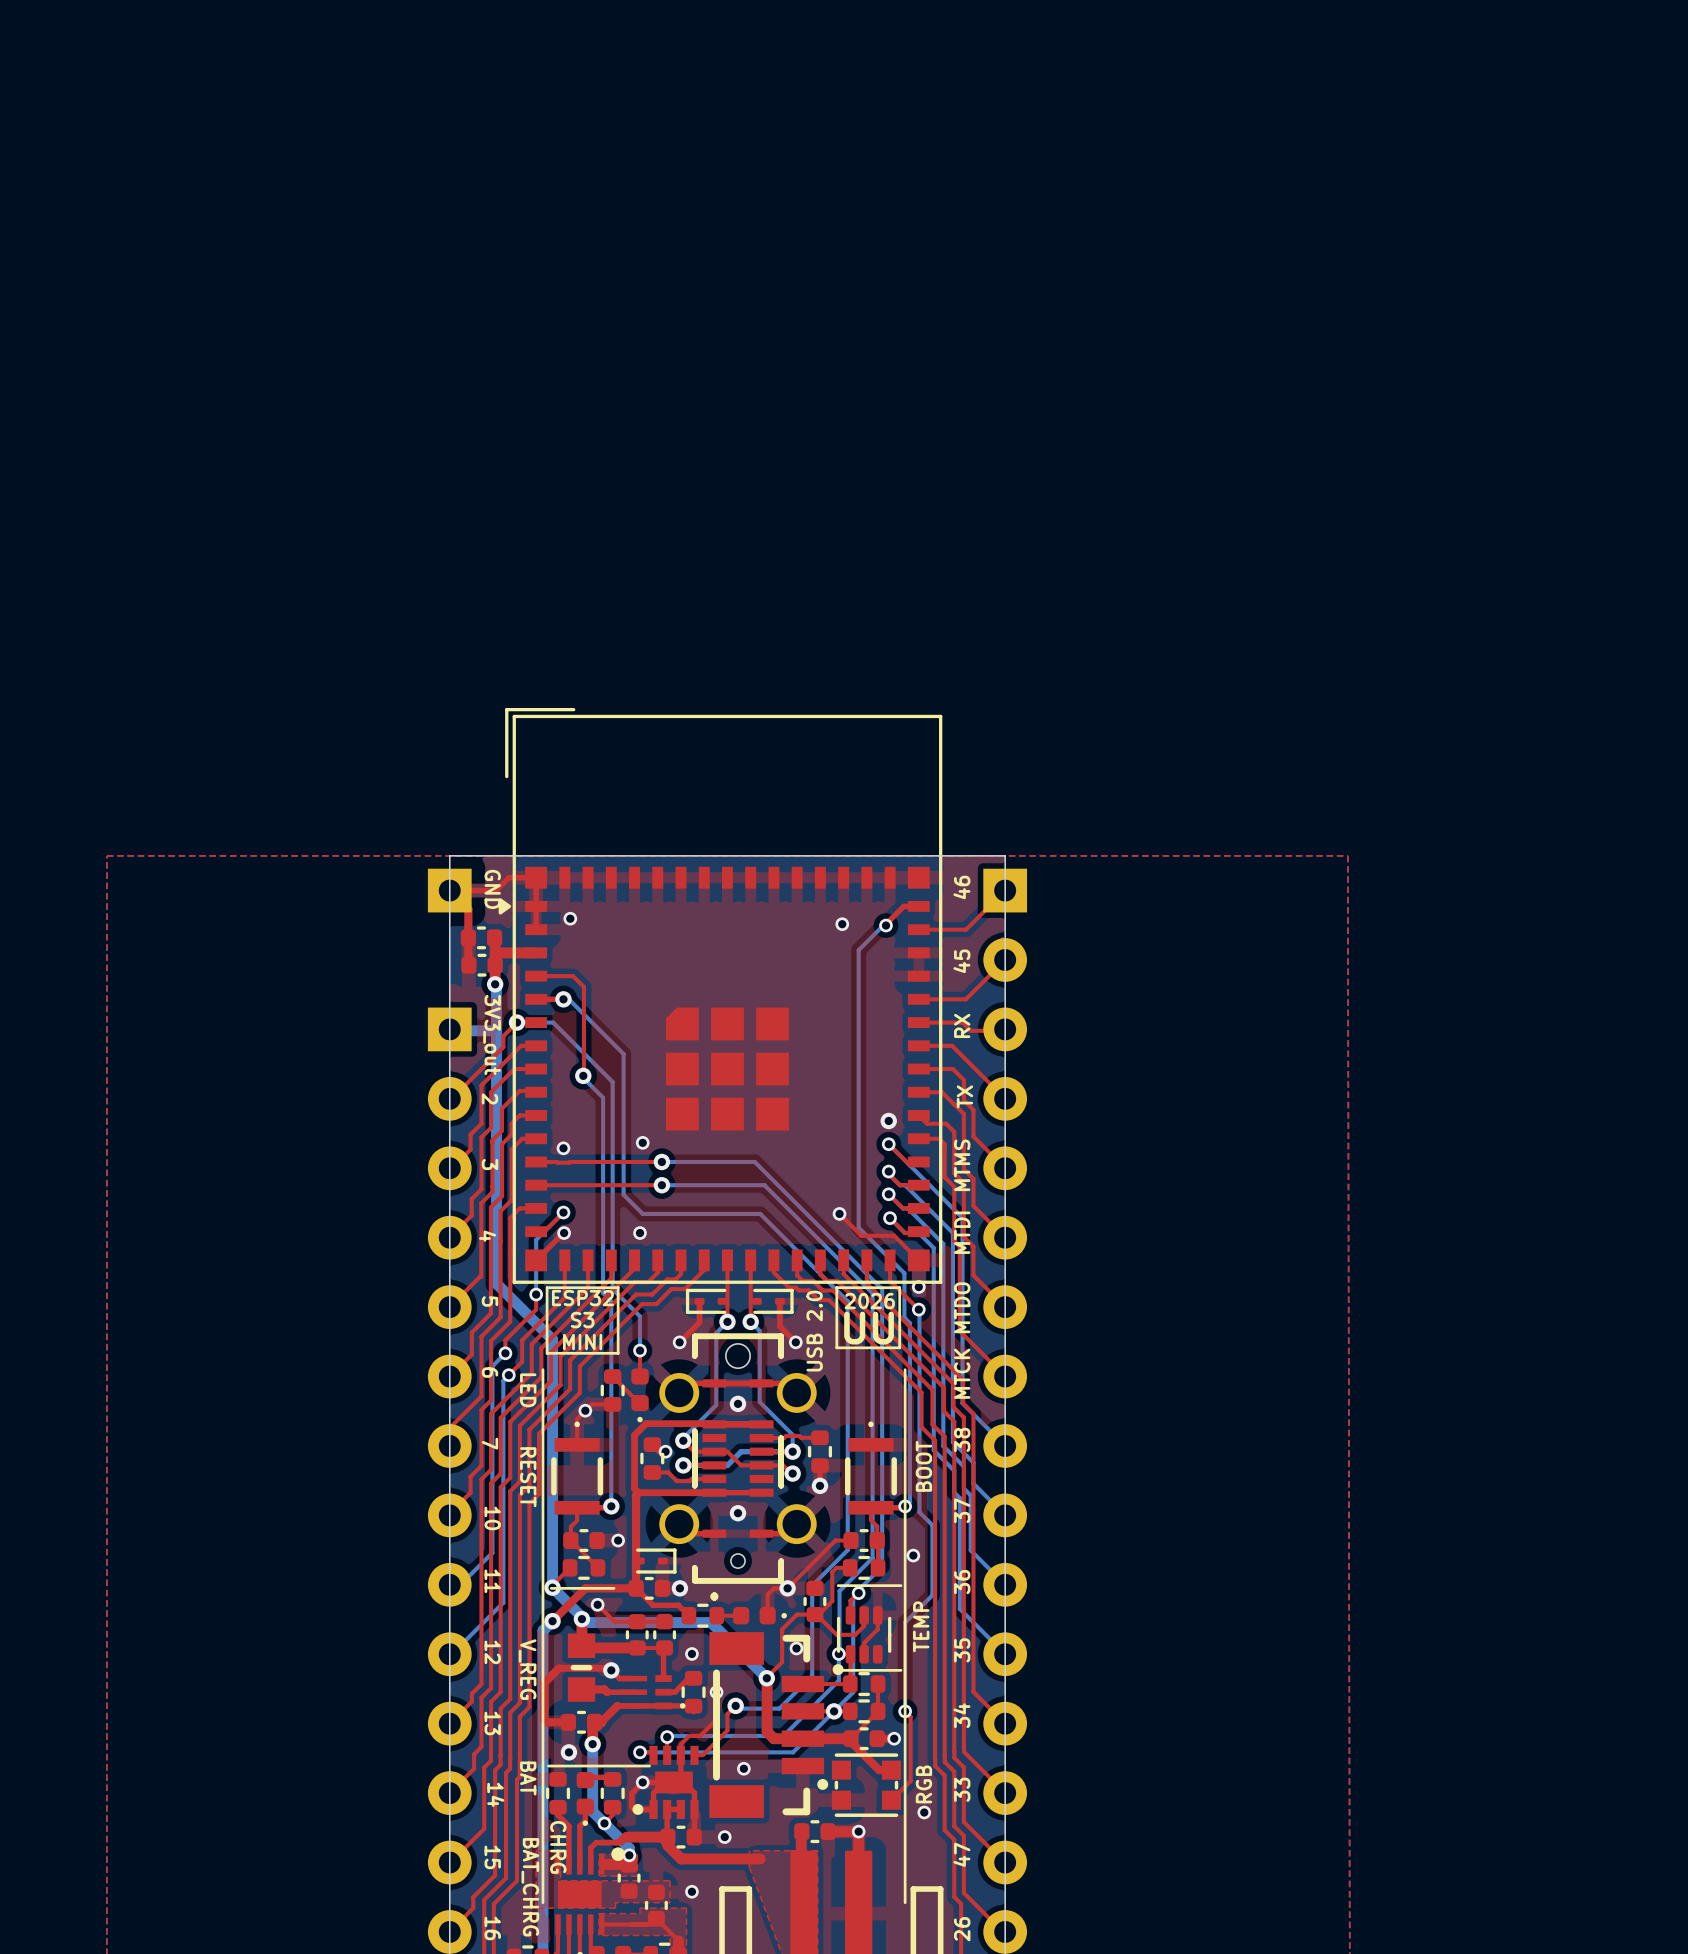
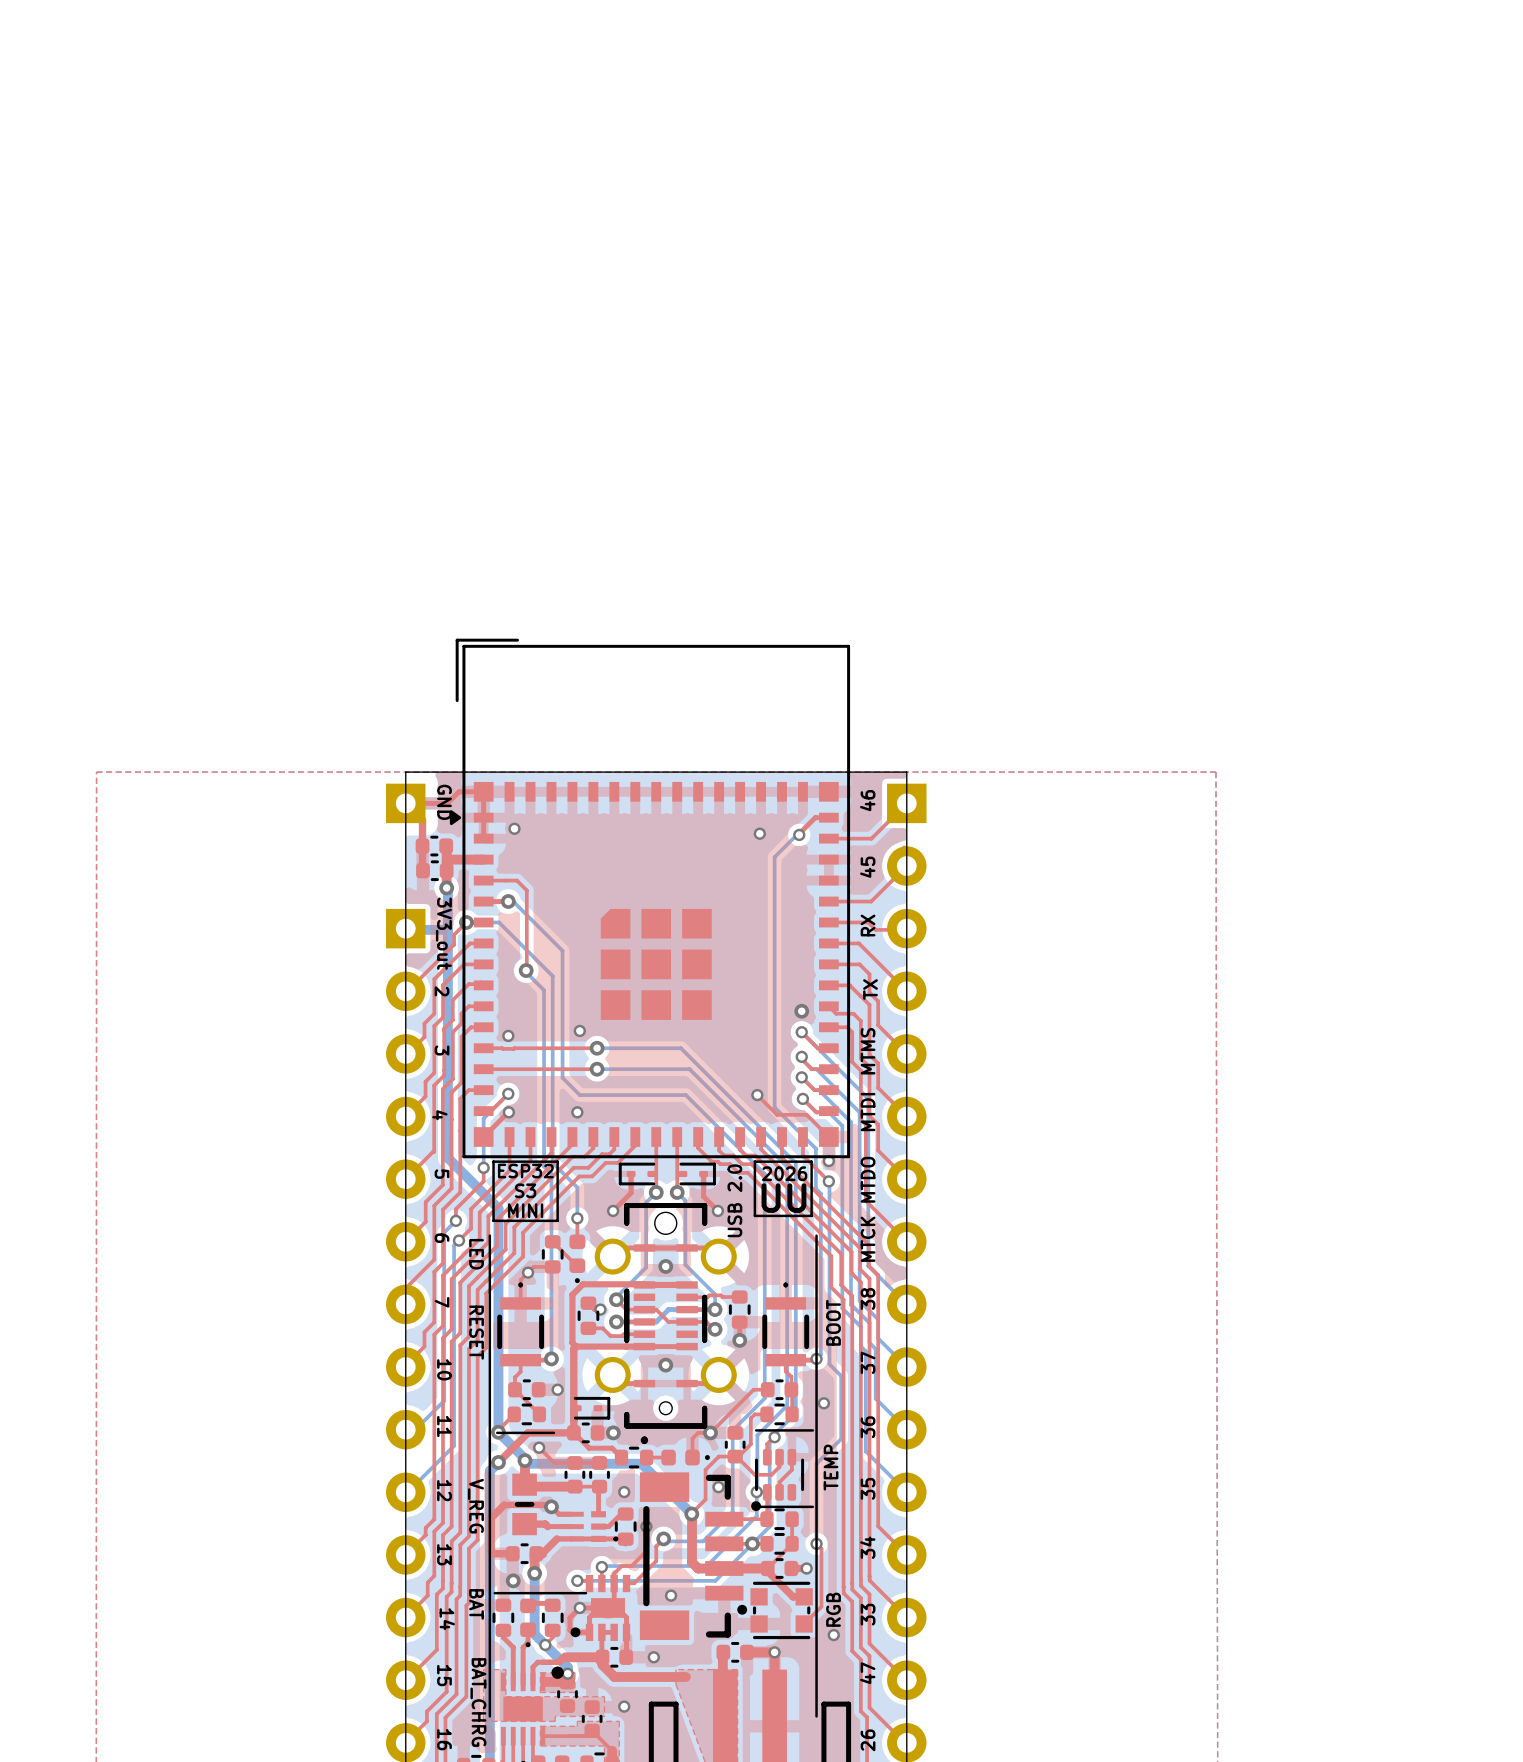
text: CHRG (558, 1847) -> none

